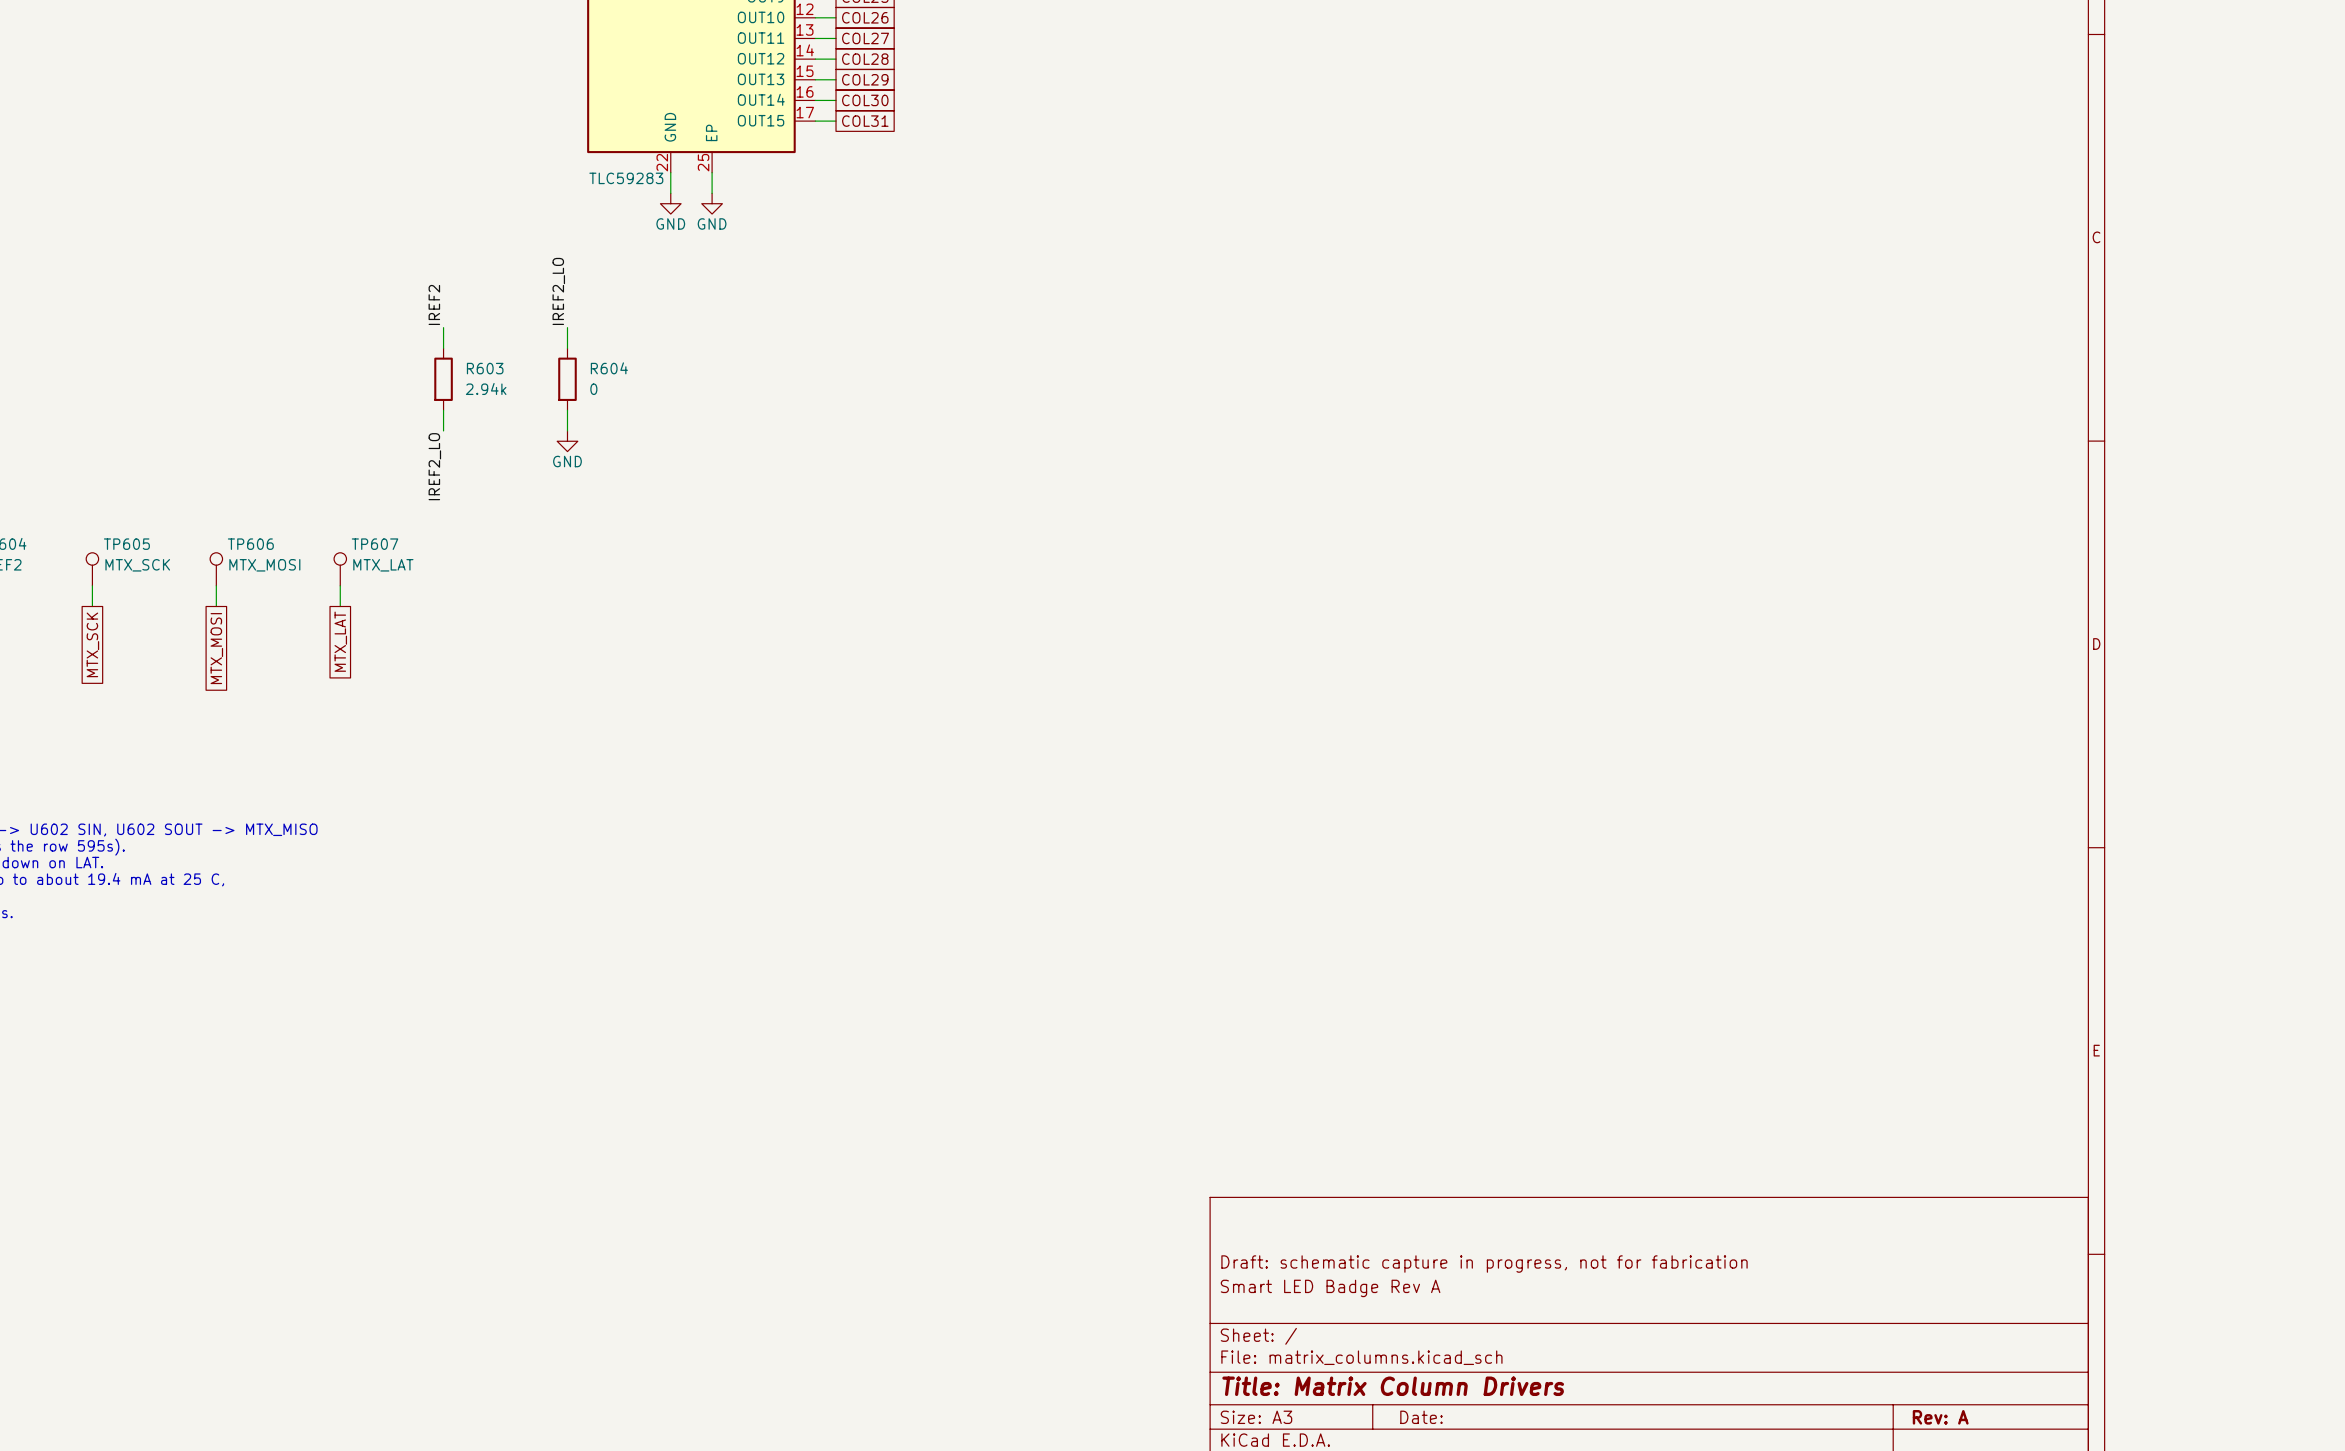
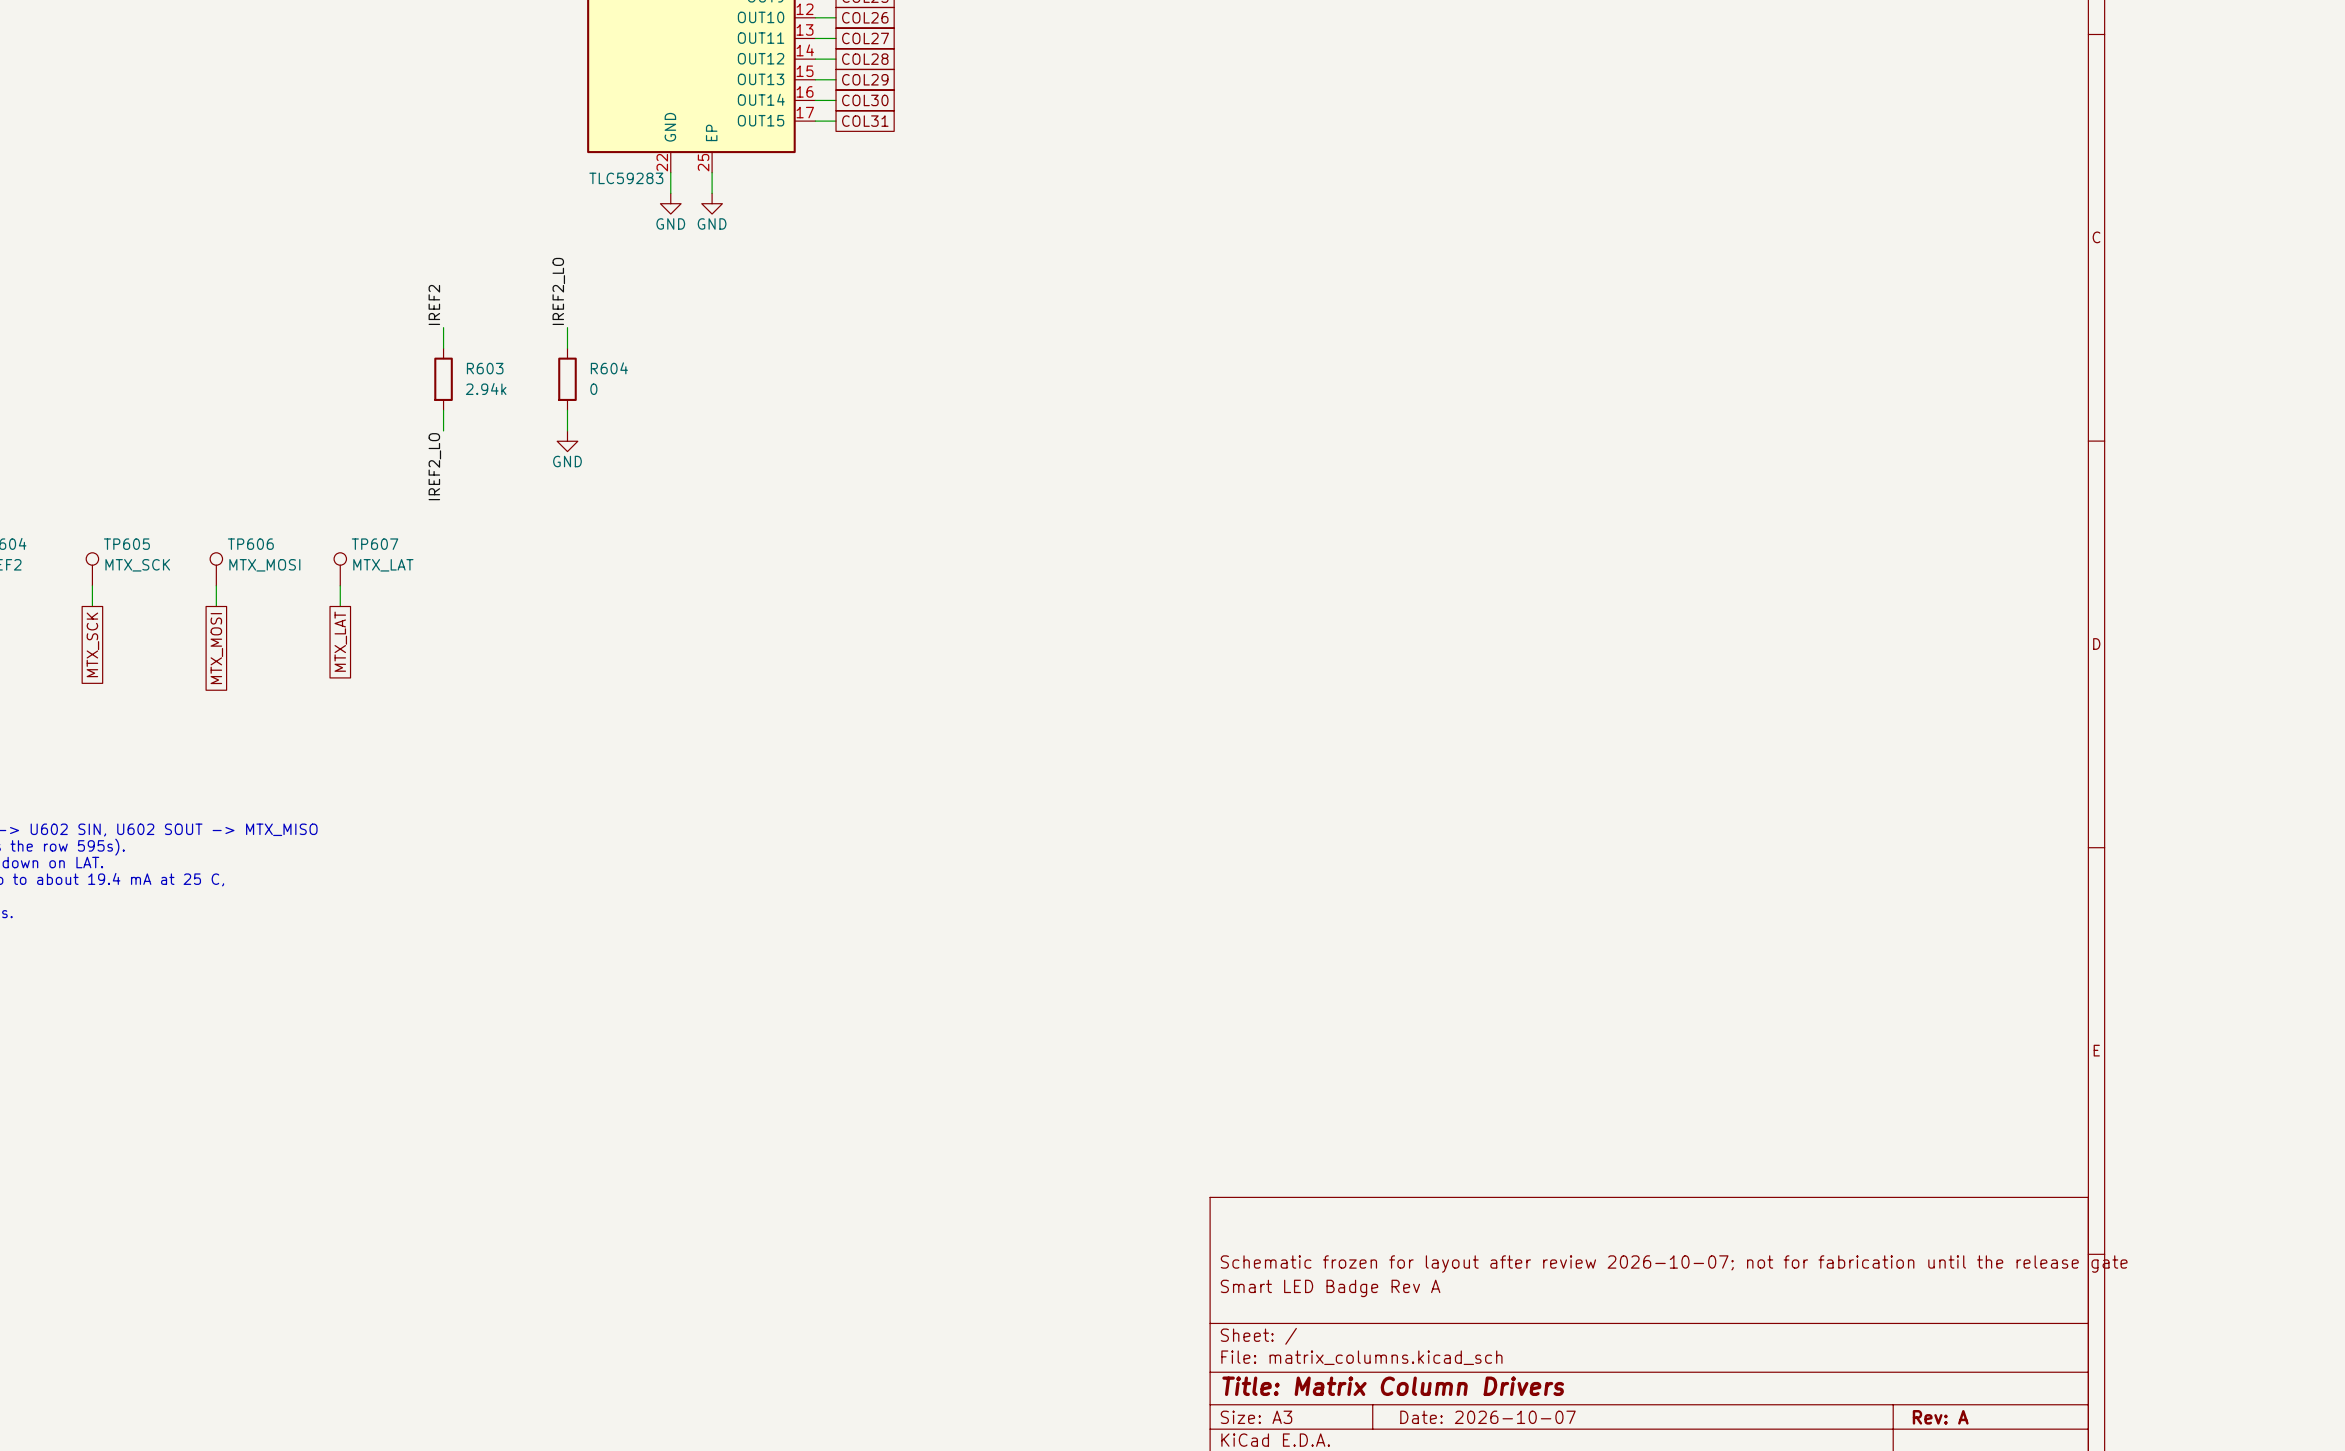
title block: Draft: schematic capture in progress, not for fabrication (1484, 1264) -> Schematic frozen for layout after review 2026-10-07; not for fabrication until the release gate (1674, 1264)
title block: Date: (1421, 1417) -> Date: 2026-10-07 (1487, 1417)

